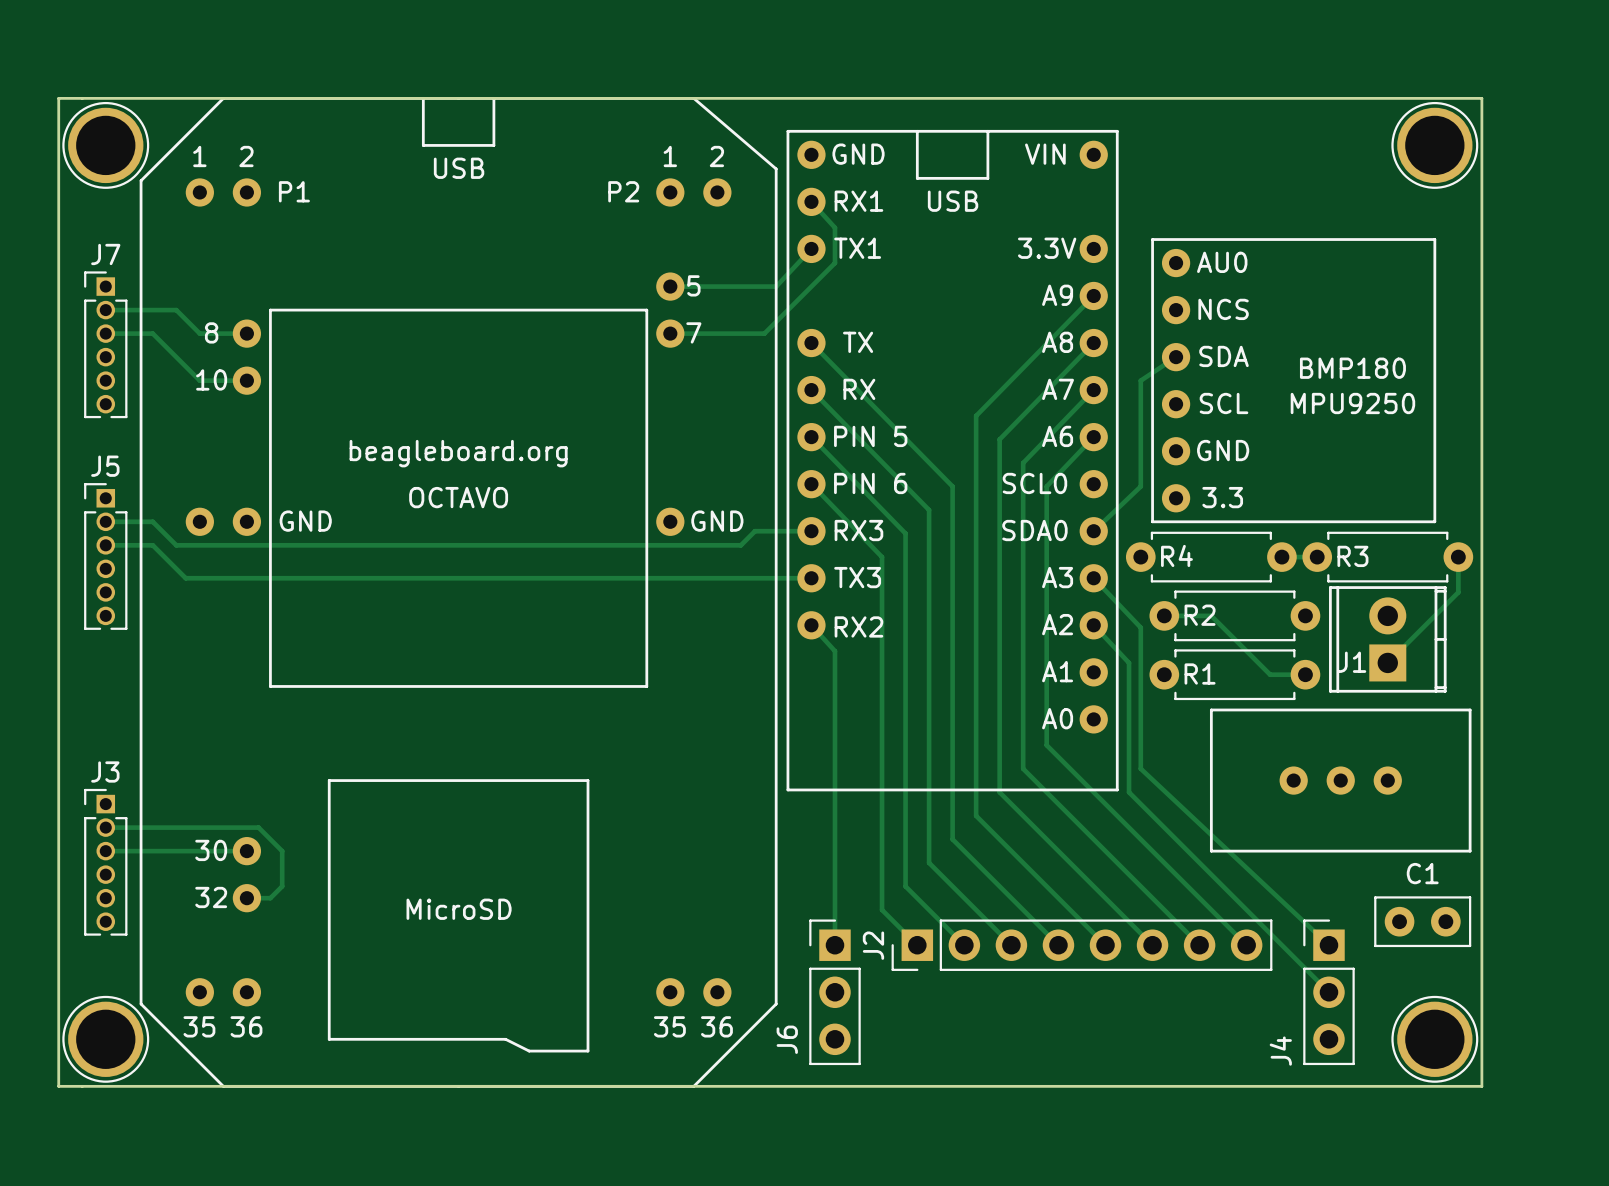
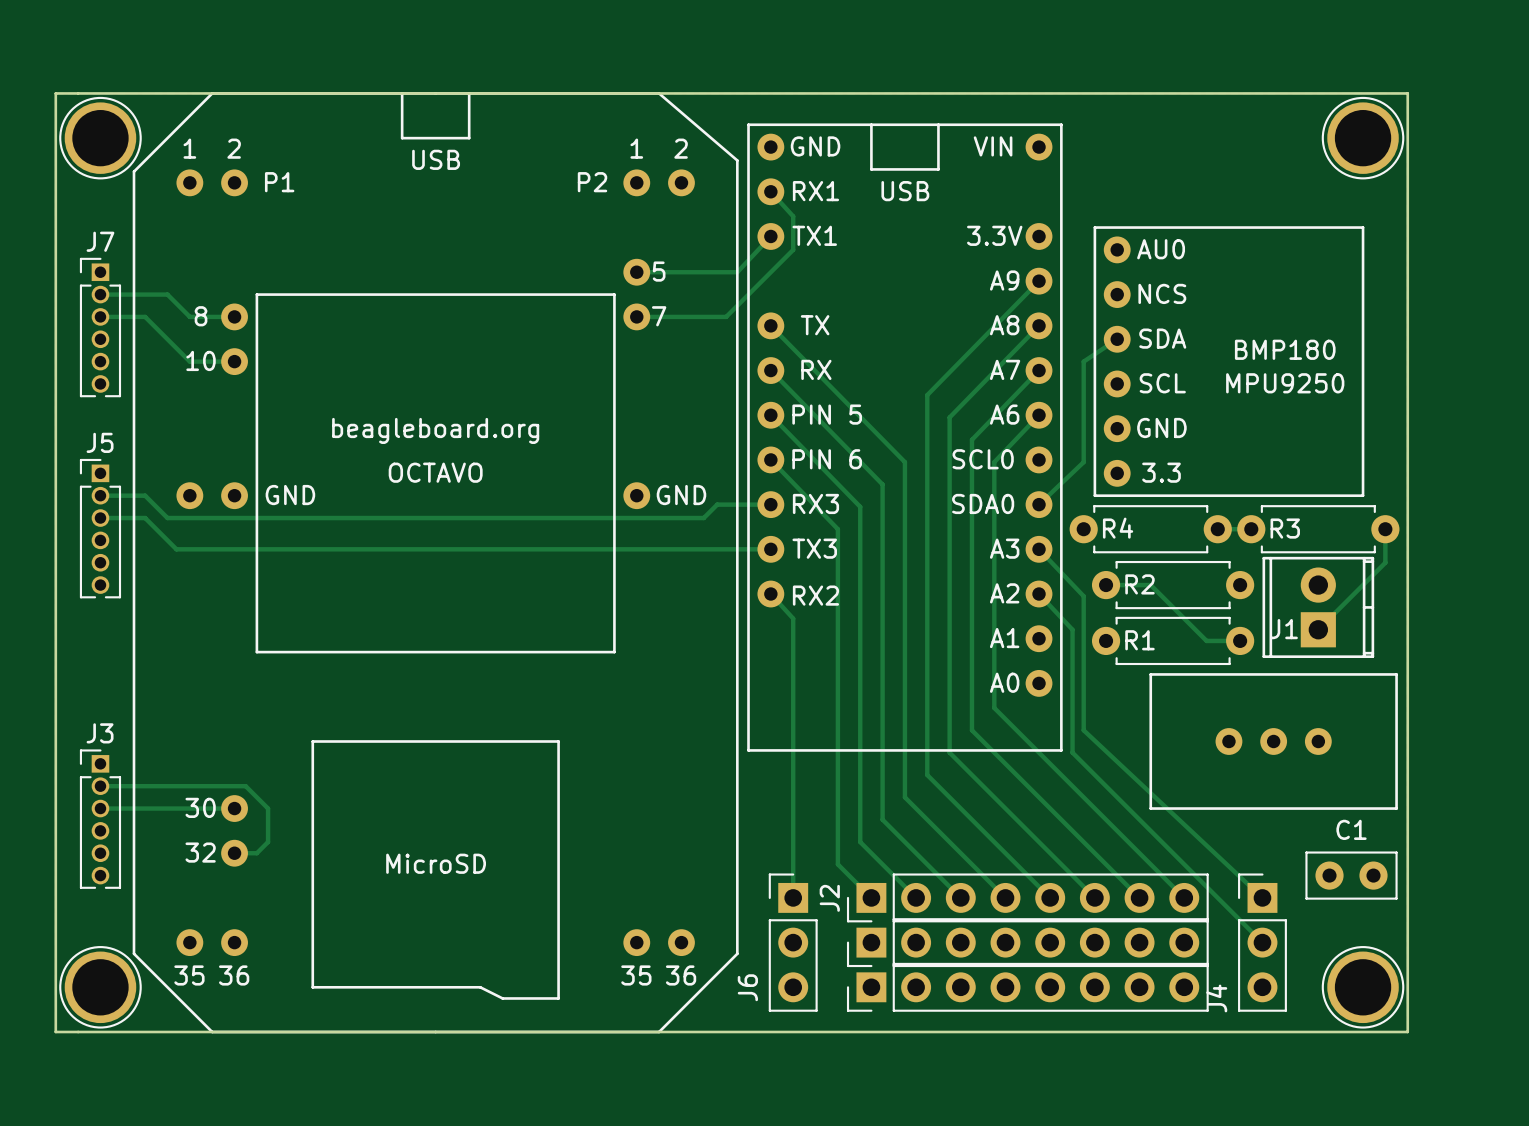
part: none -> (1027, 942)
part: none -> (1027, 987)

